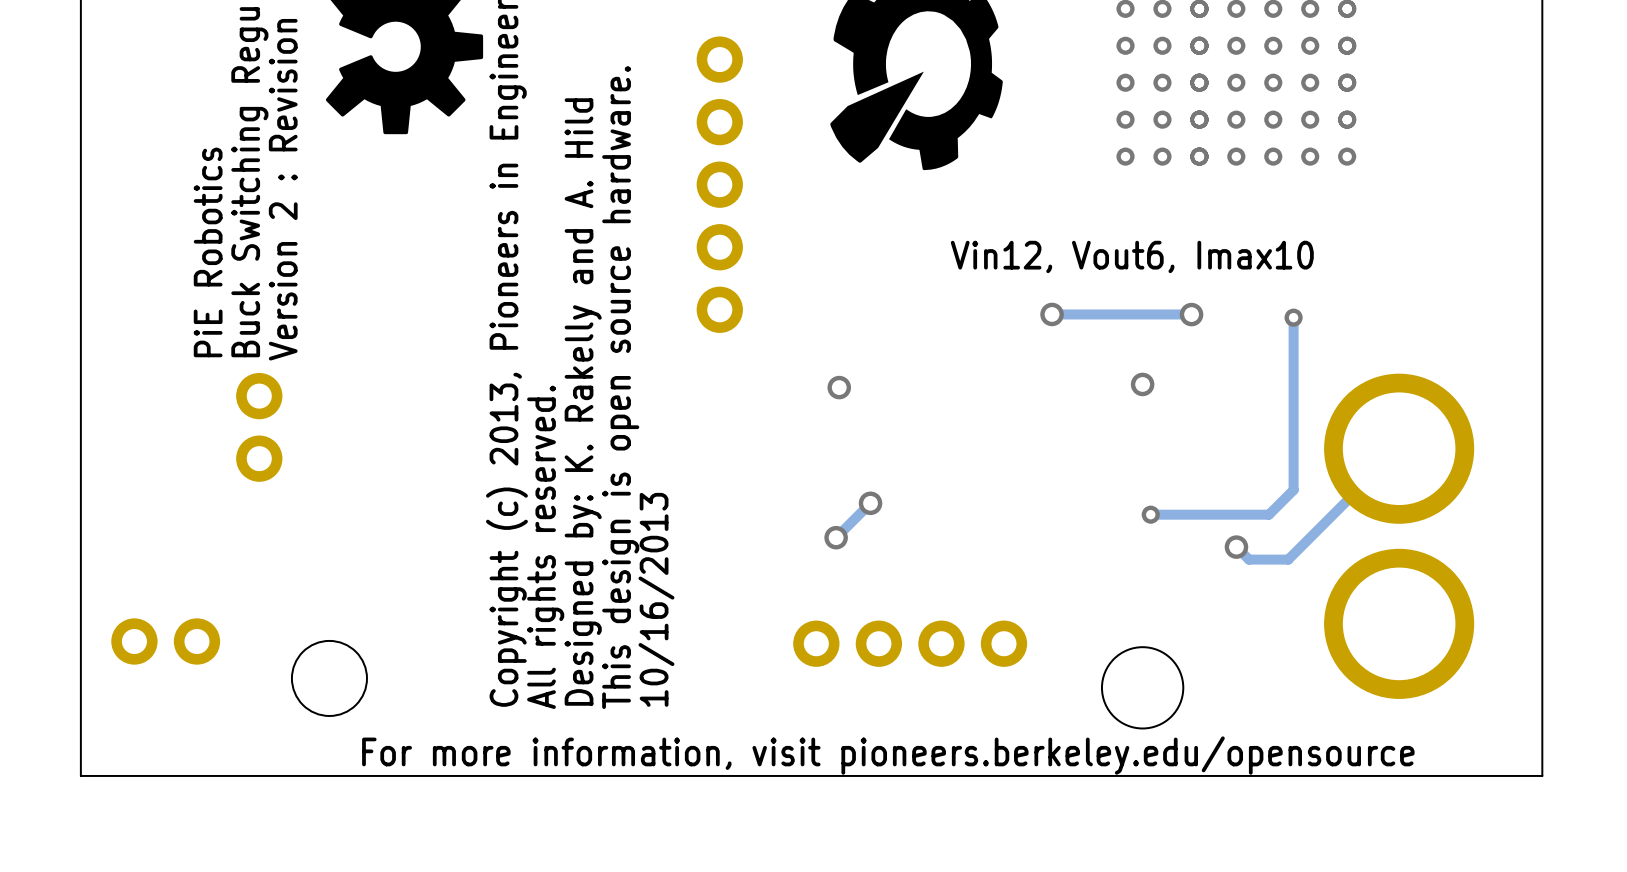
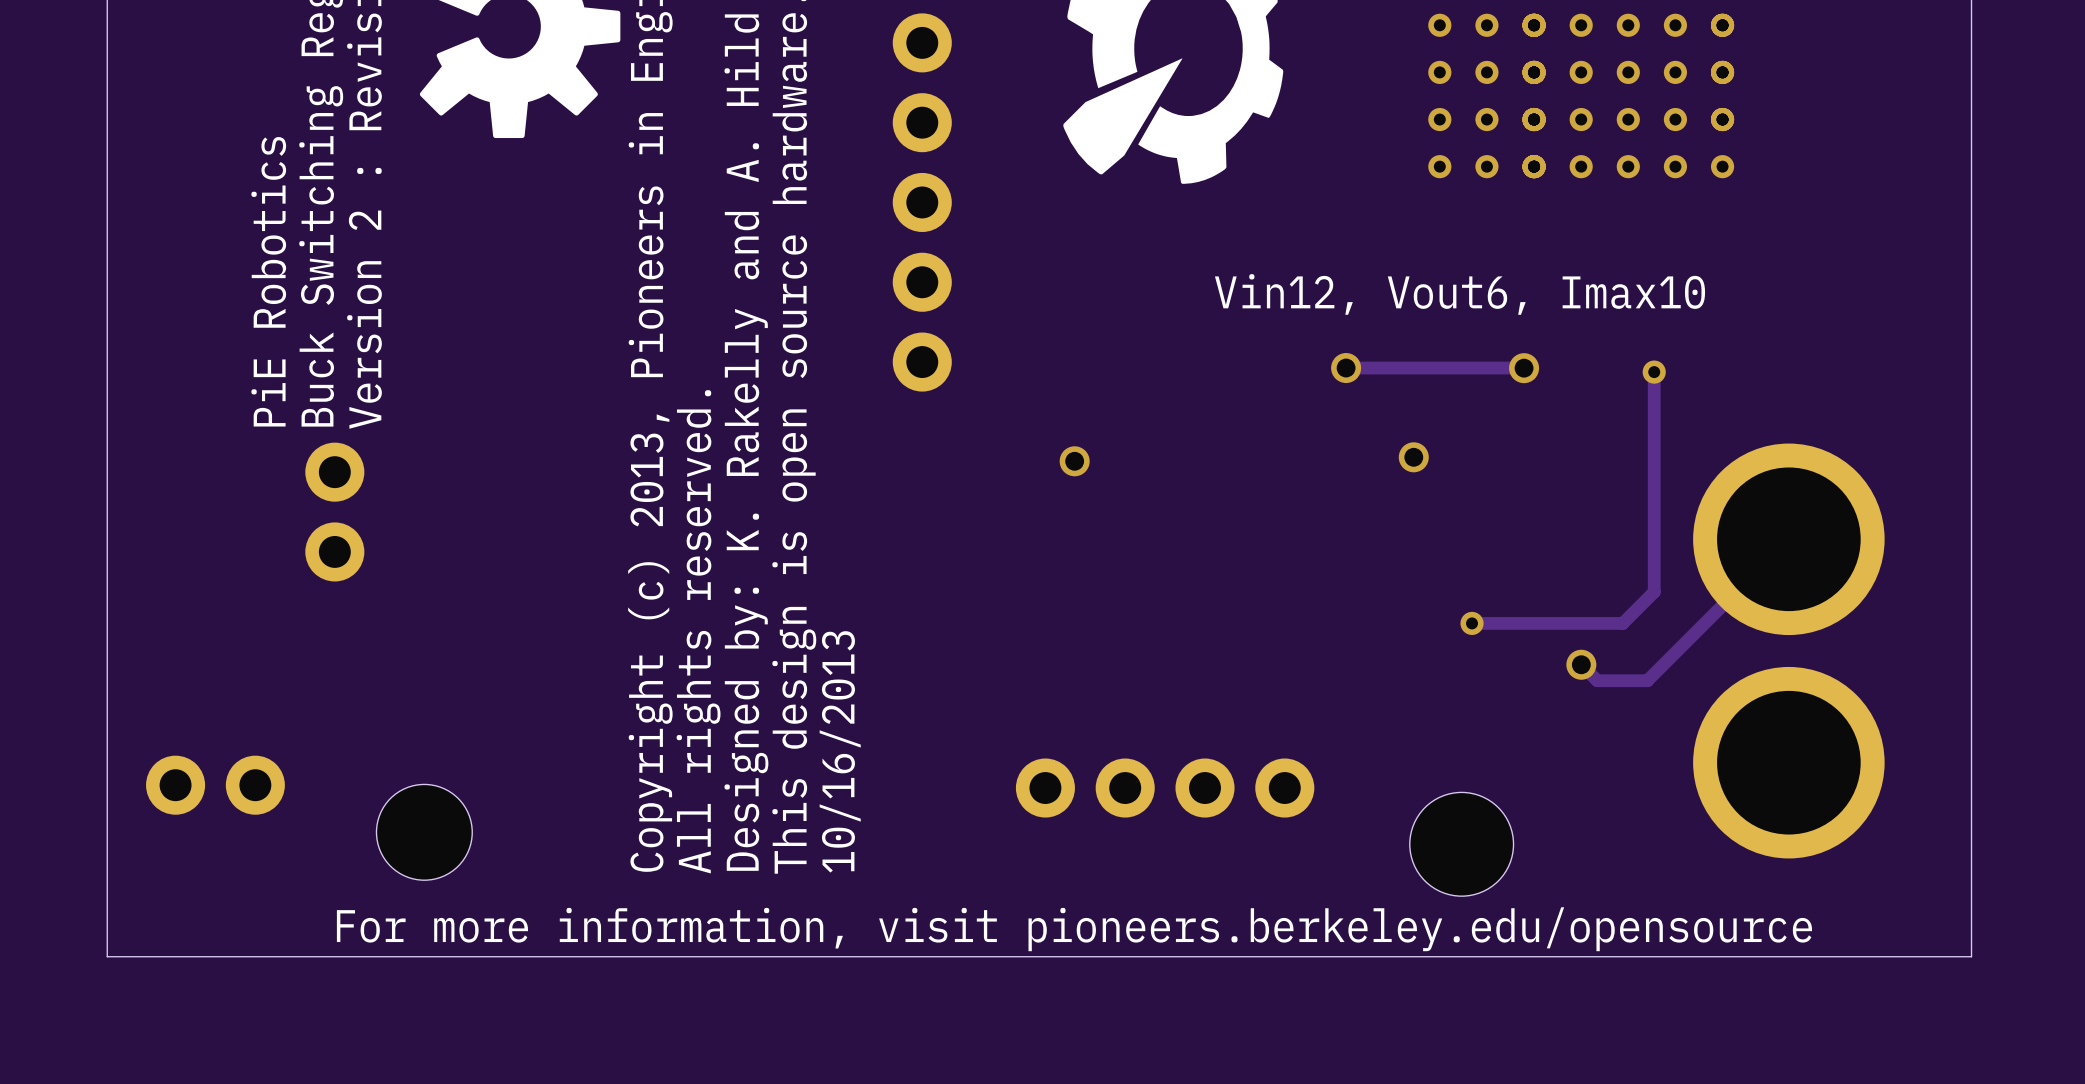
via position: (1142, 384) -> (1413, 457)
track: (870, 503) (836, 537) -> none
via: (870, 503) -> none
via: (836, 537) -> none

